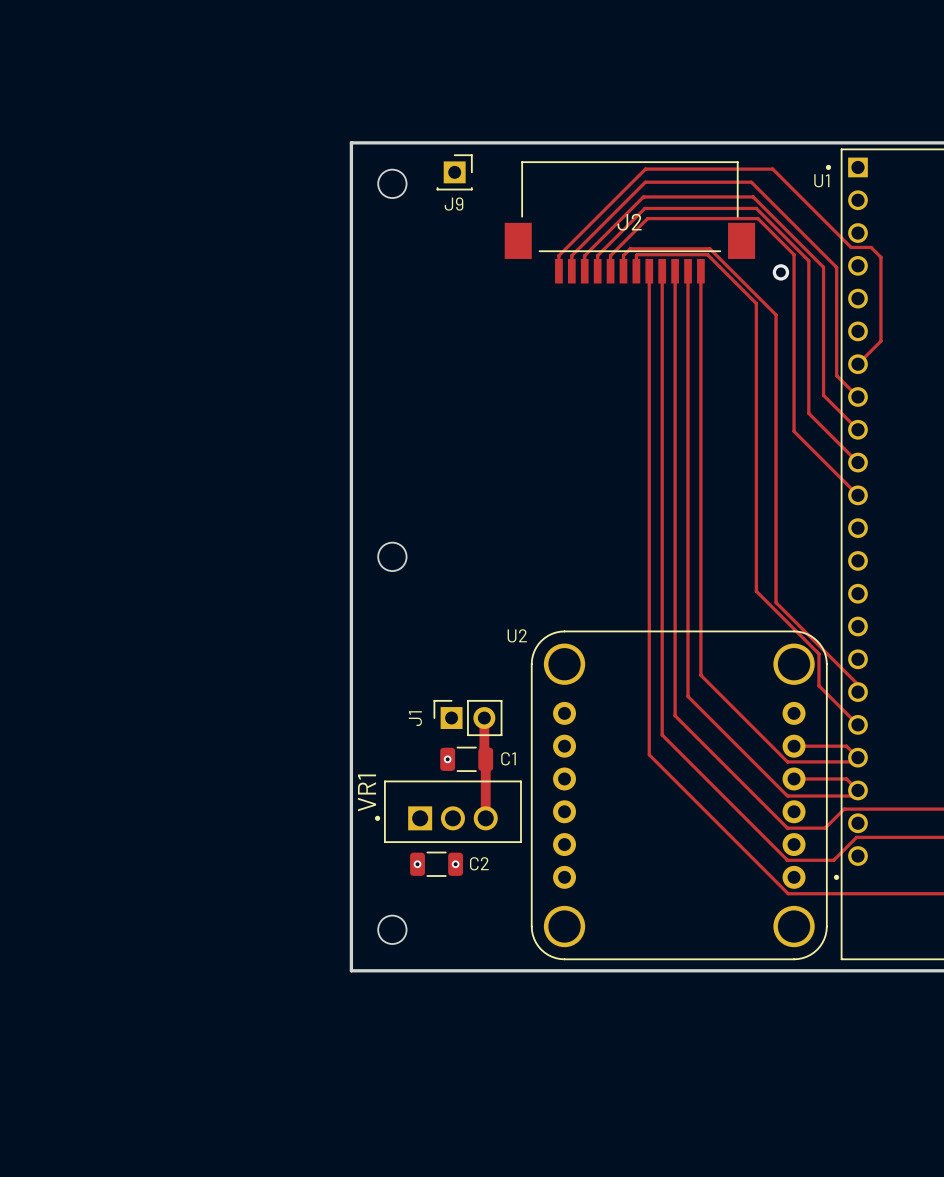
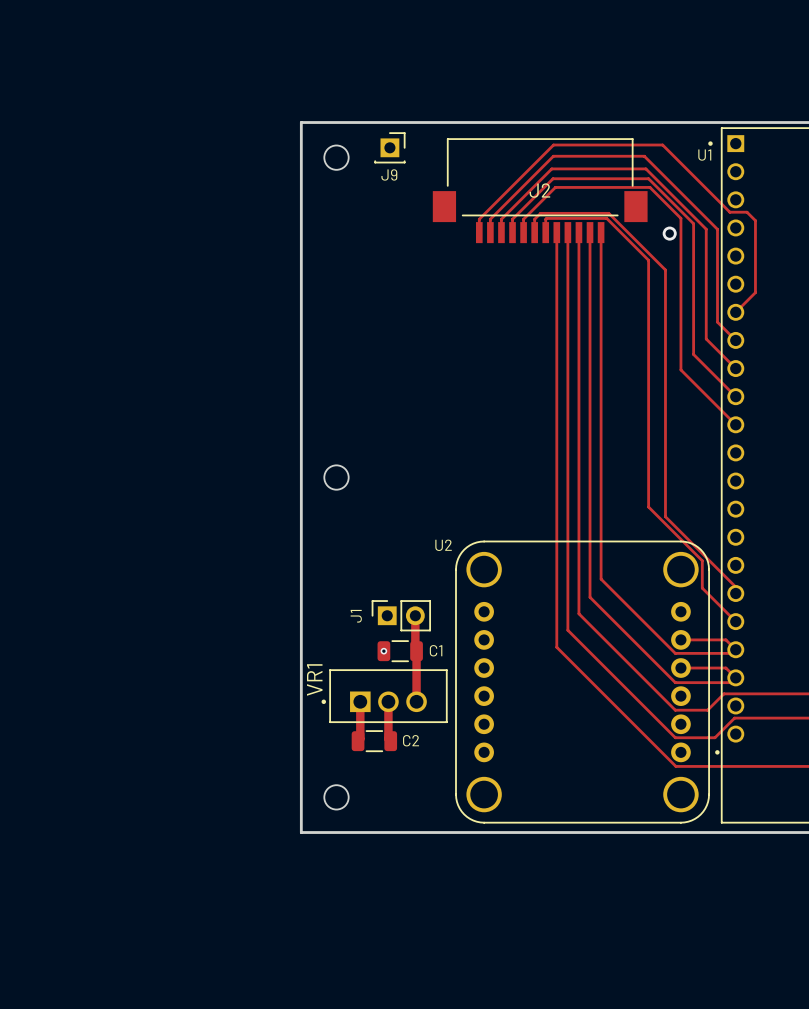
track: none -> (360, 701) (360, 738) (358, 741)
track: none -> (388, 701) (388, 738) (390, 741)
via: (417, 864) -> none
via: (455, 864) -> none

